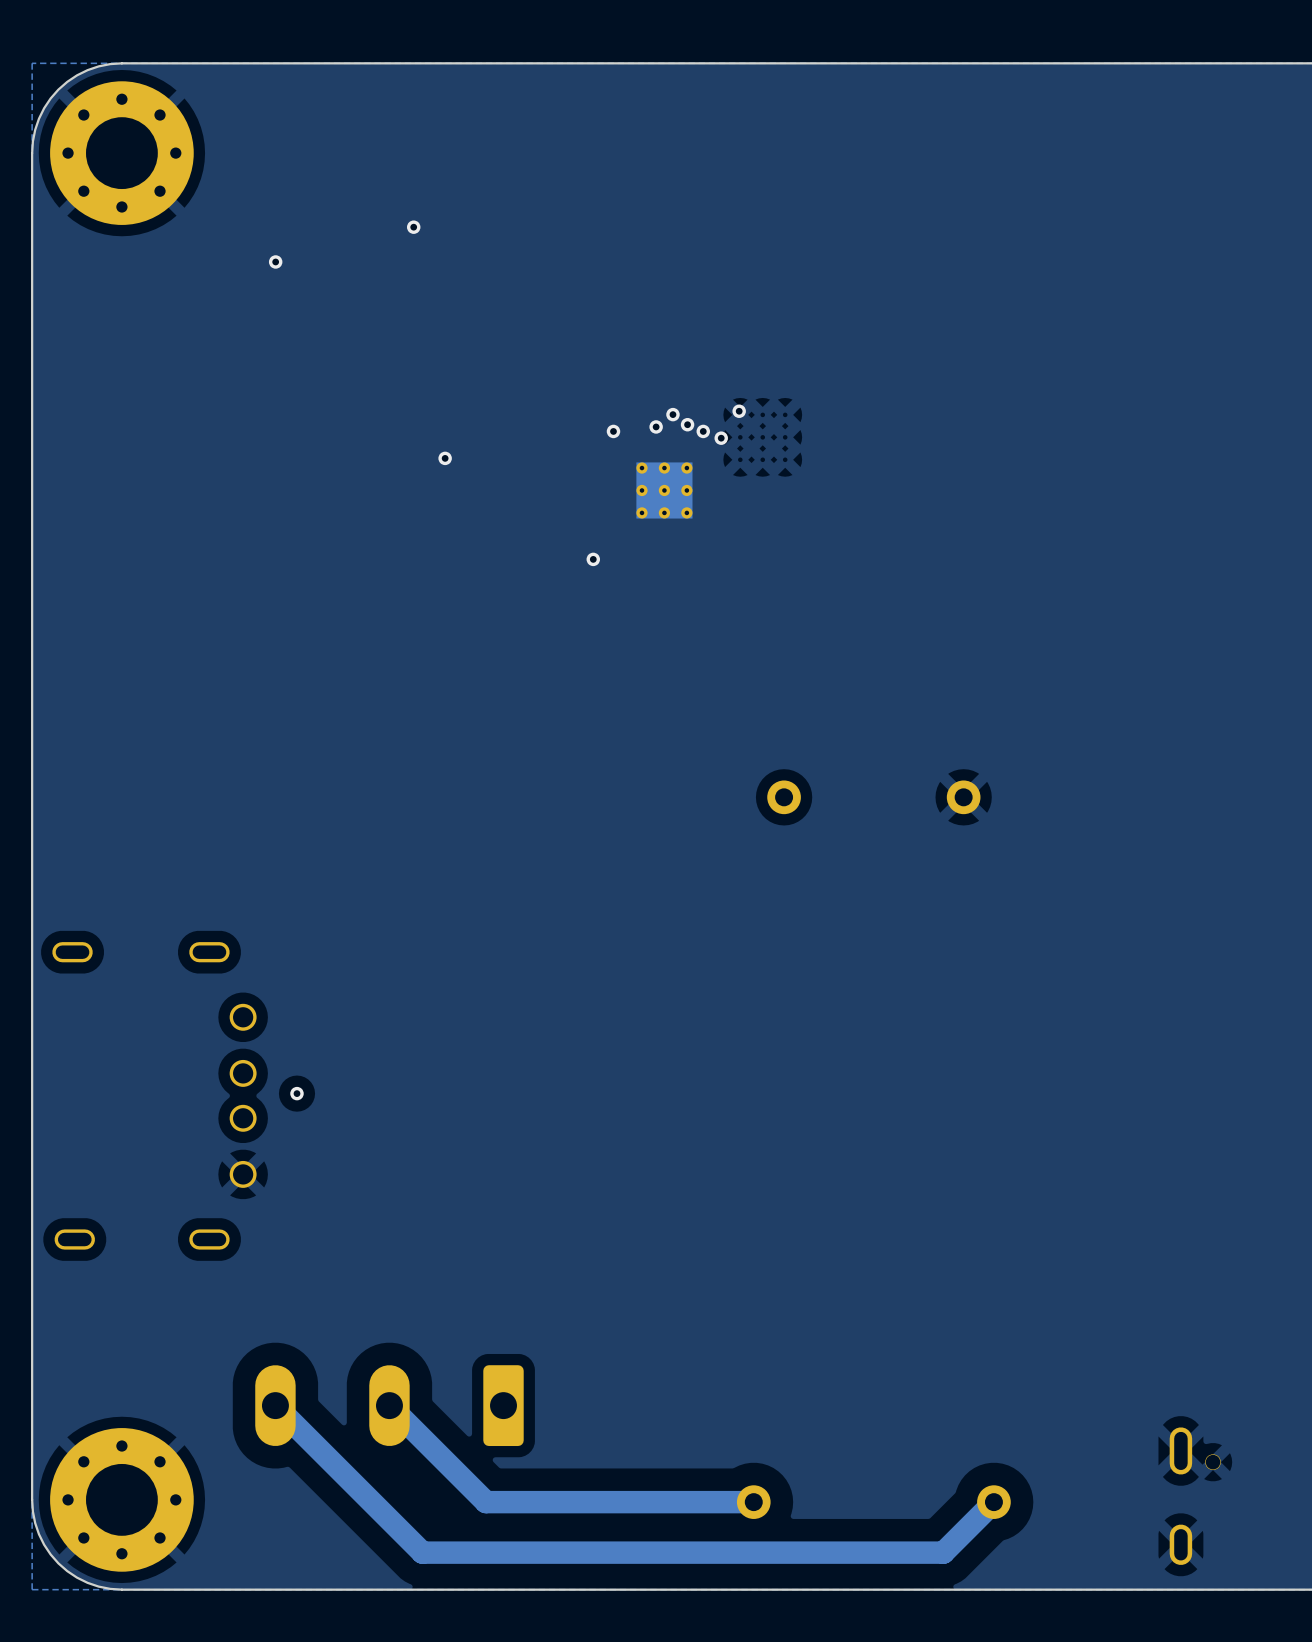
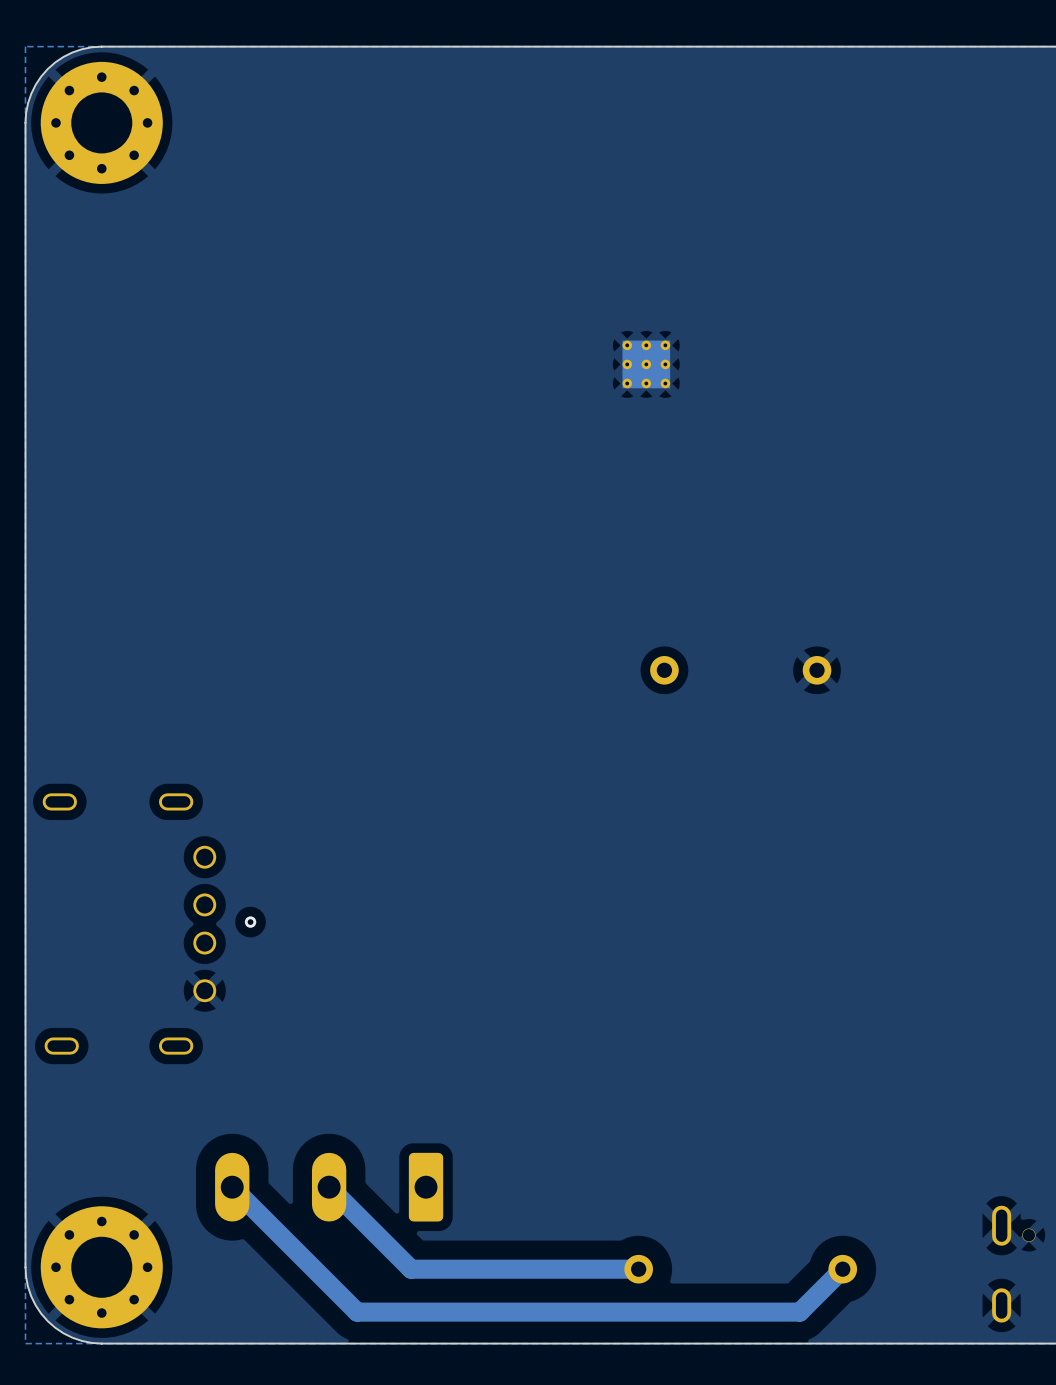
via: (413, 227) -> none
via: (275, 261) -> none
via: (739, 411) -> none
via: (672, 414) -> none
via: (687, 424) -> none
via: (656, 426) -> none
via: (613, 431) -> none
via: (703, 431) -> none
via: (721, 438) -> none
via: (445, 458) -> none
part position: (664, 490) -> (646, 364)
via: (593, 559) -> none

